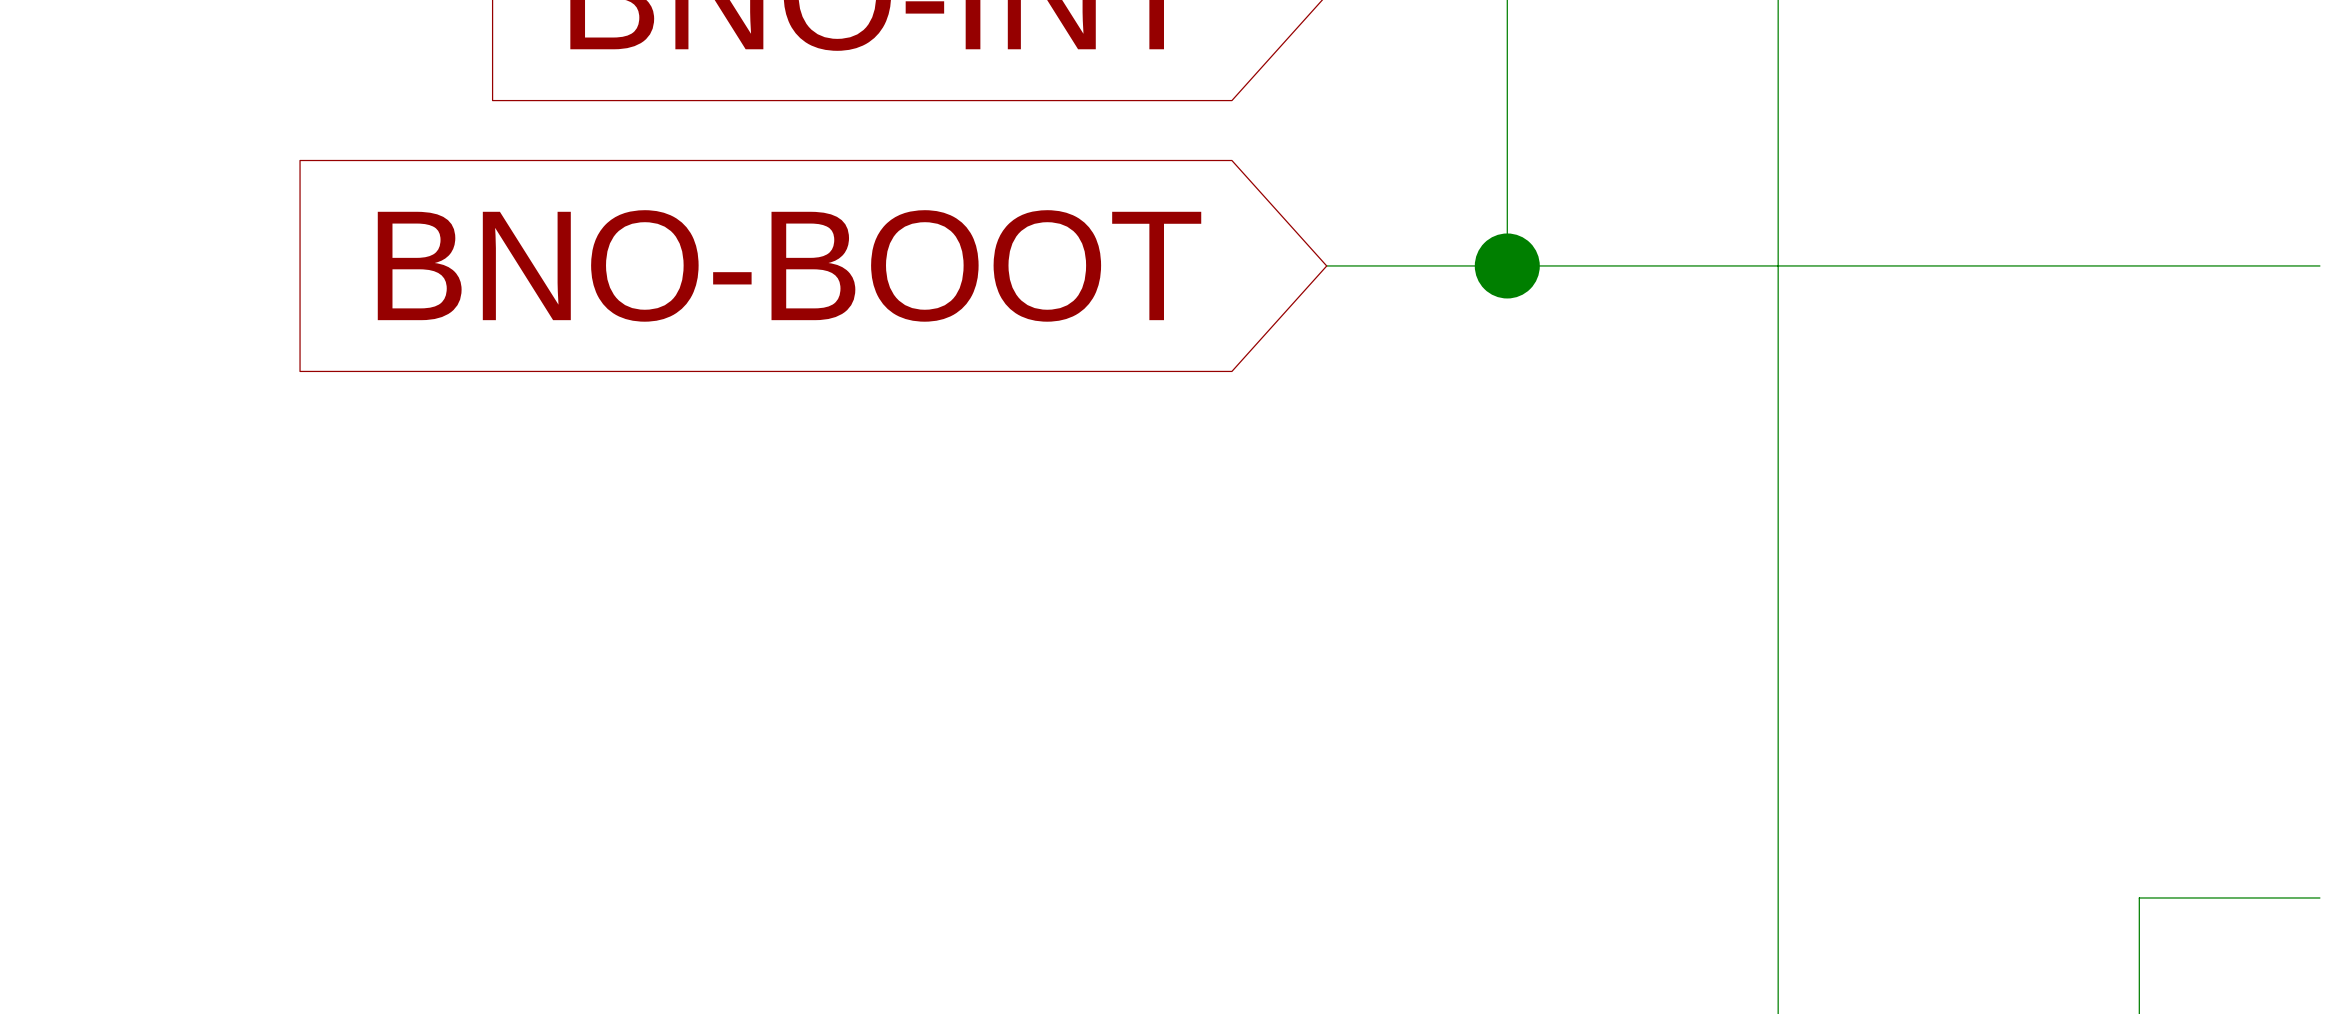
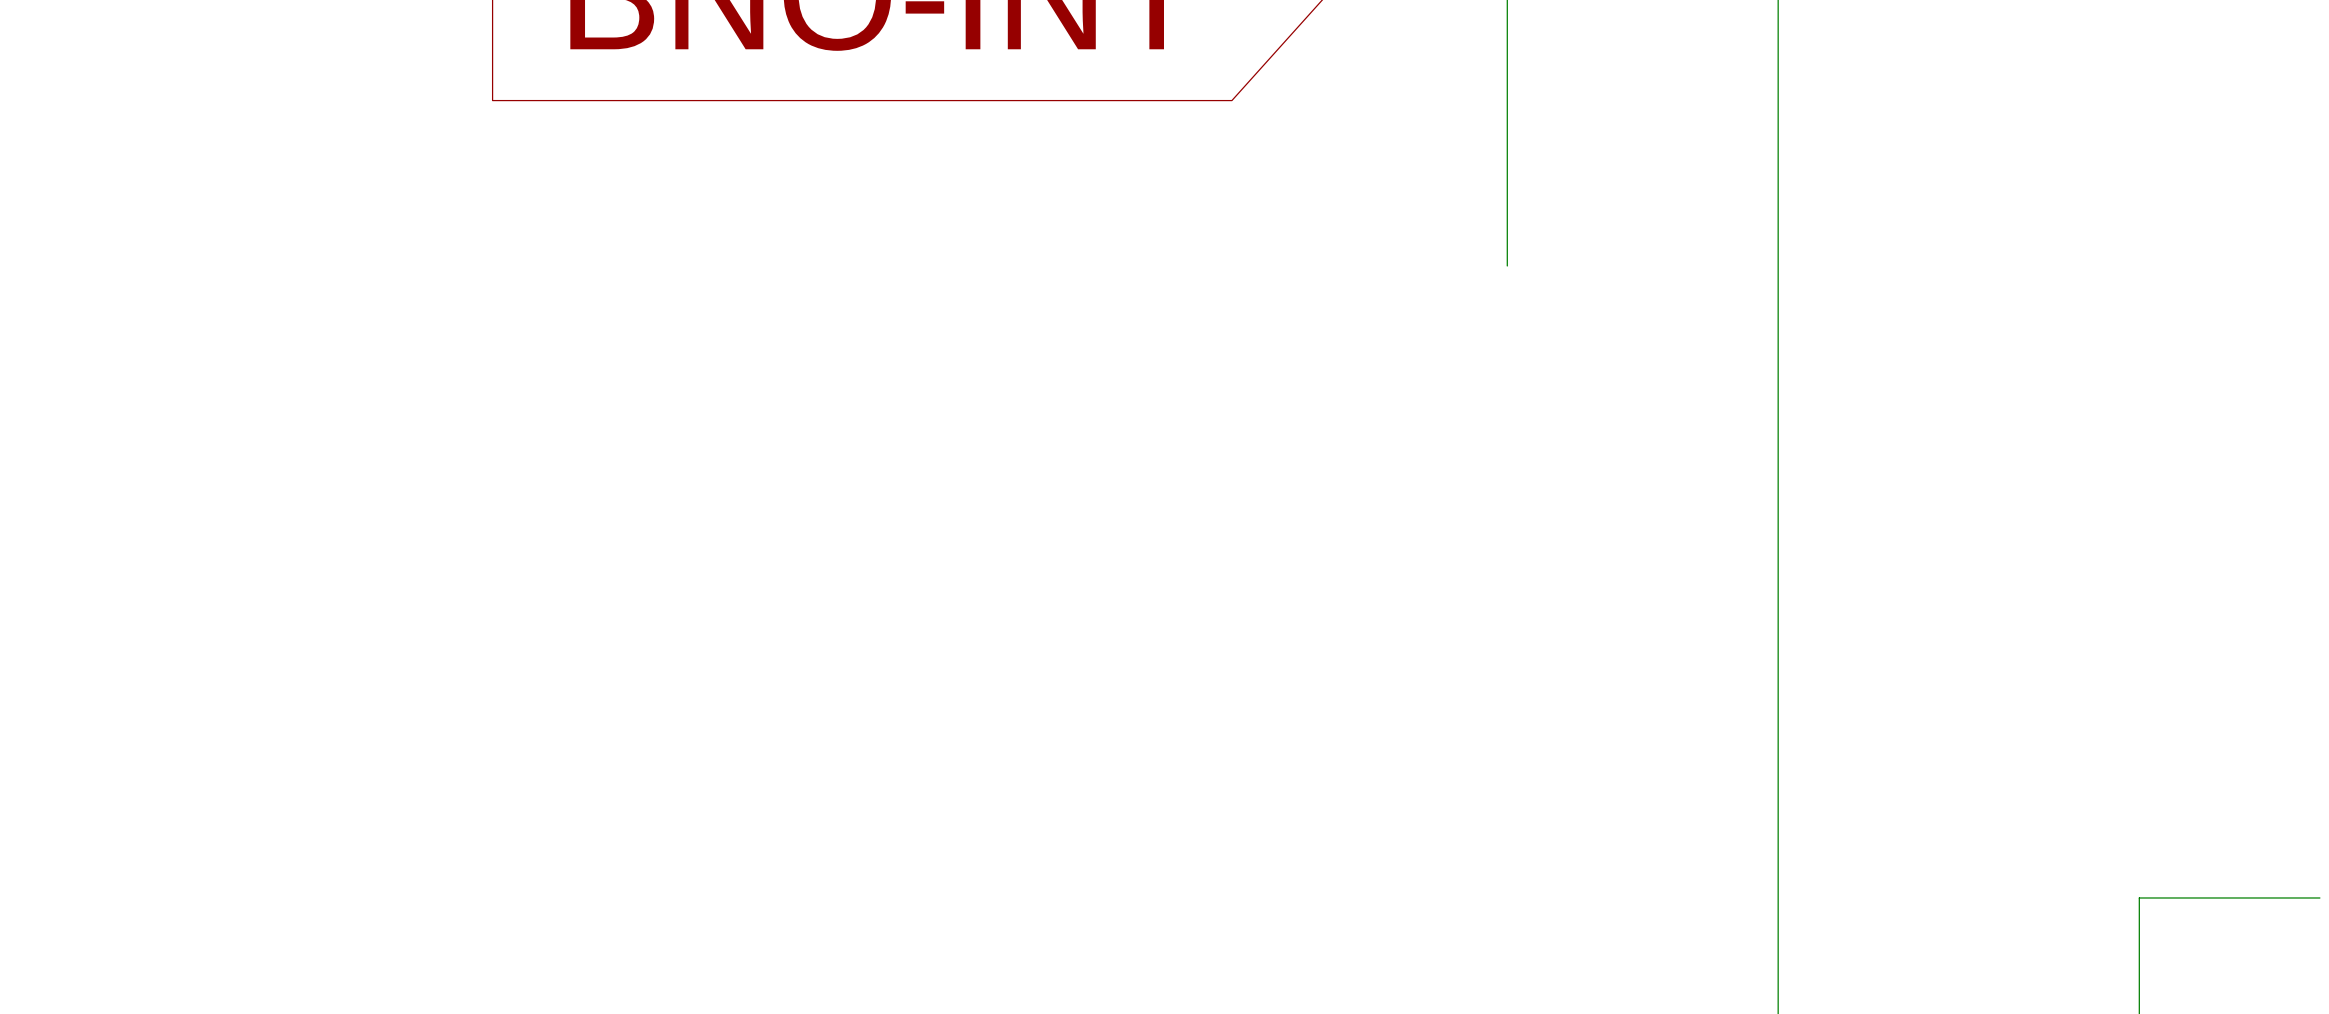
global label: BNO-BOOT (789, 265) -> none
wire: (1326, 265) (2319, 265) -> none
junction: (1507, 265) -> none

